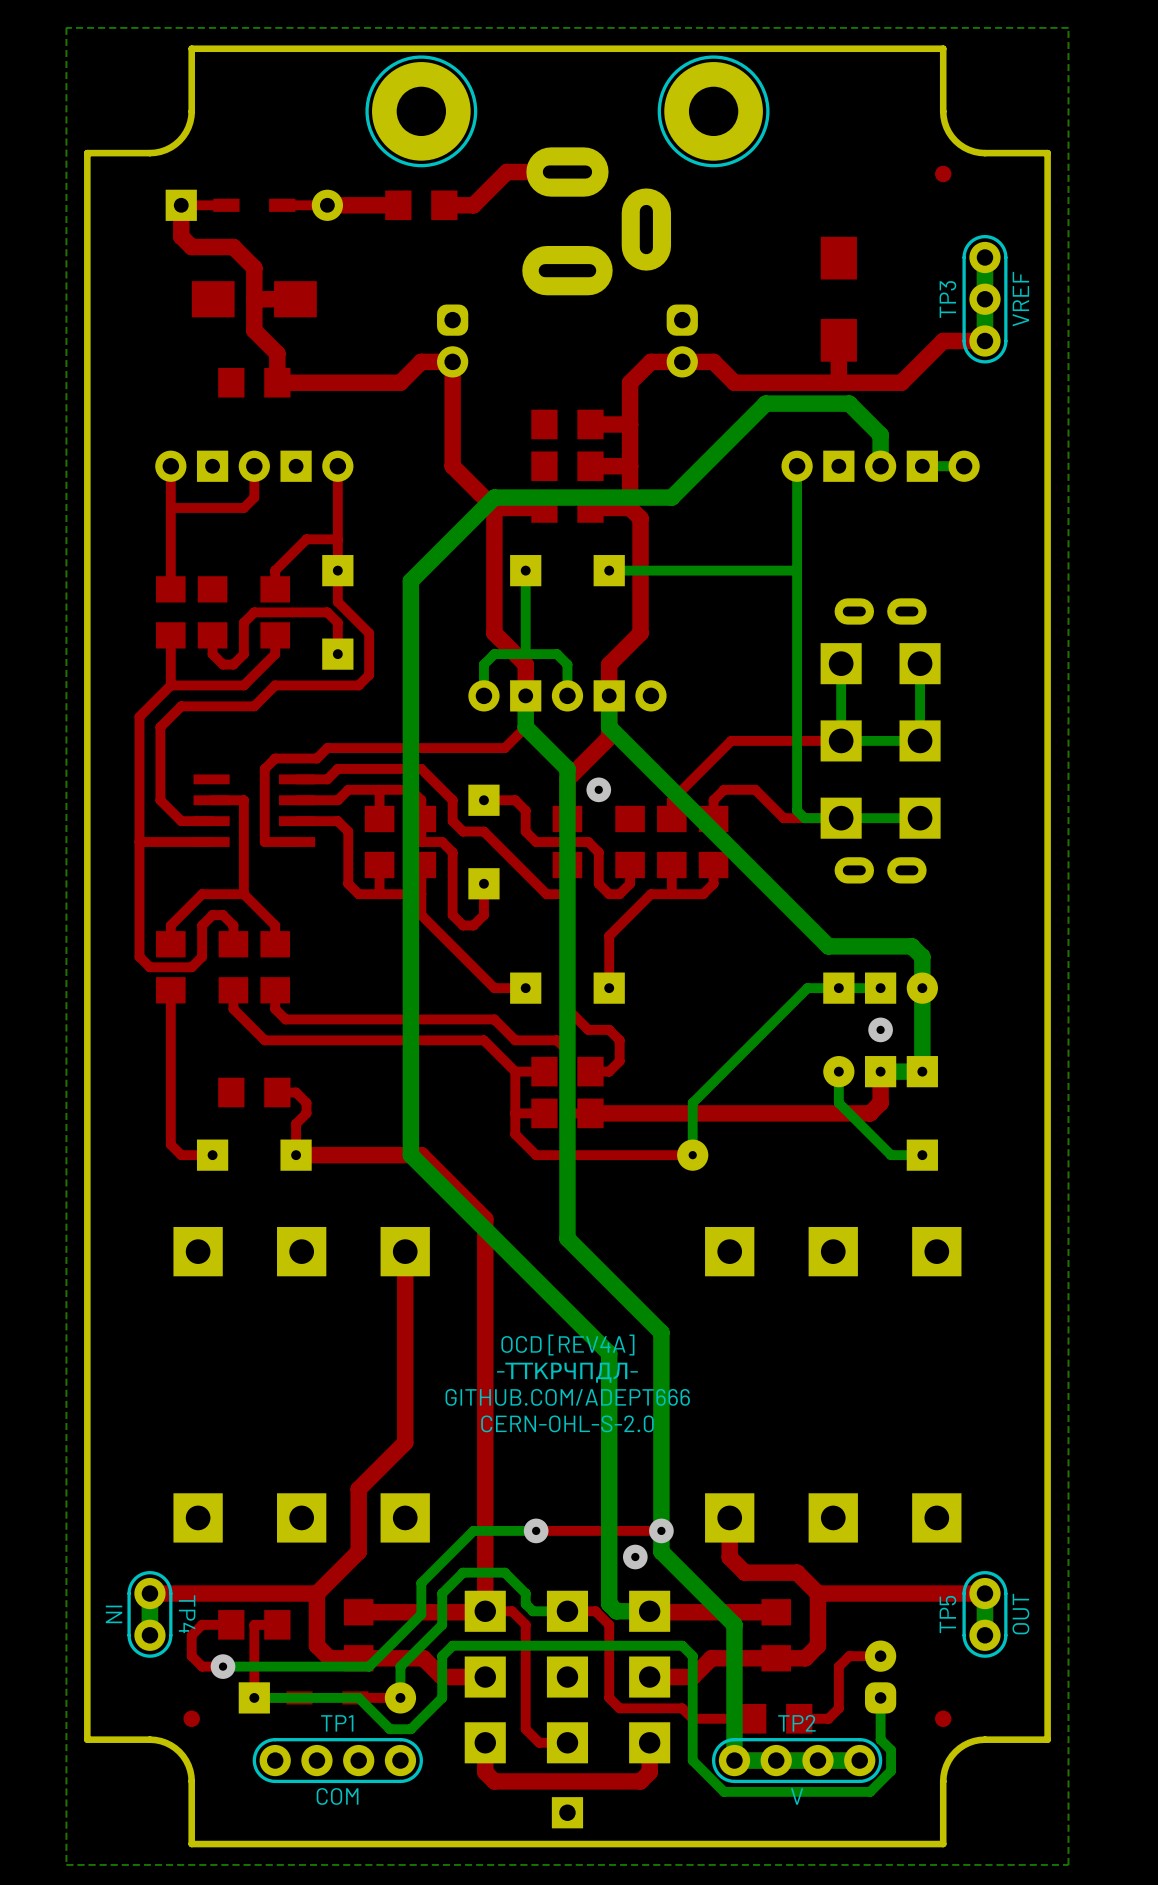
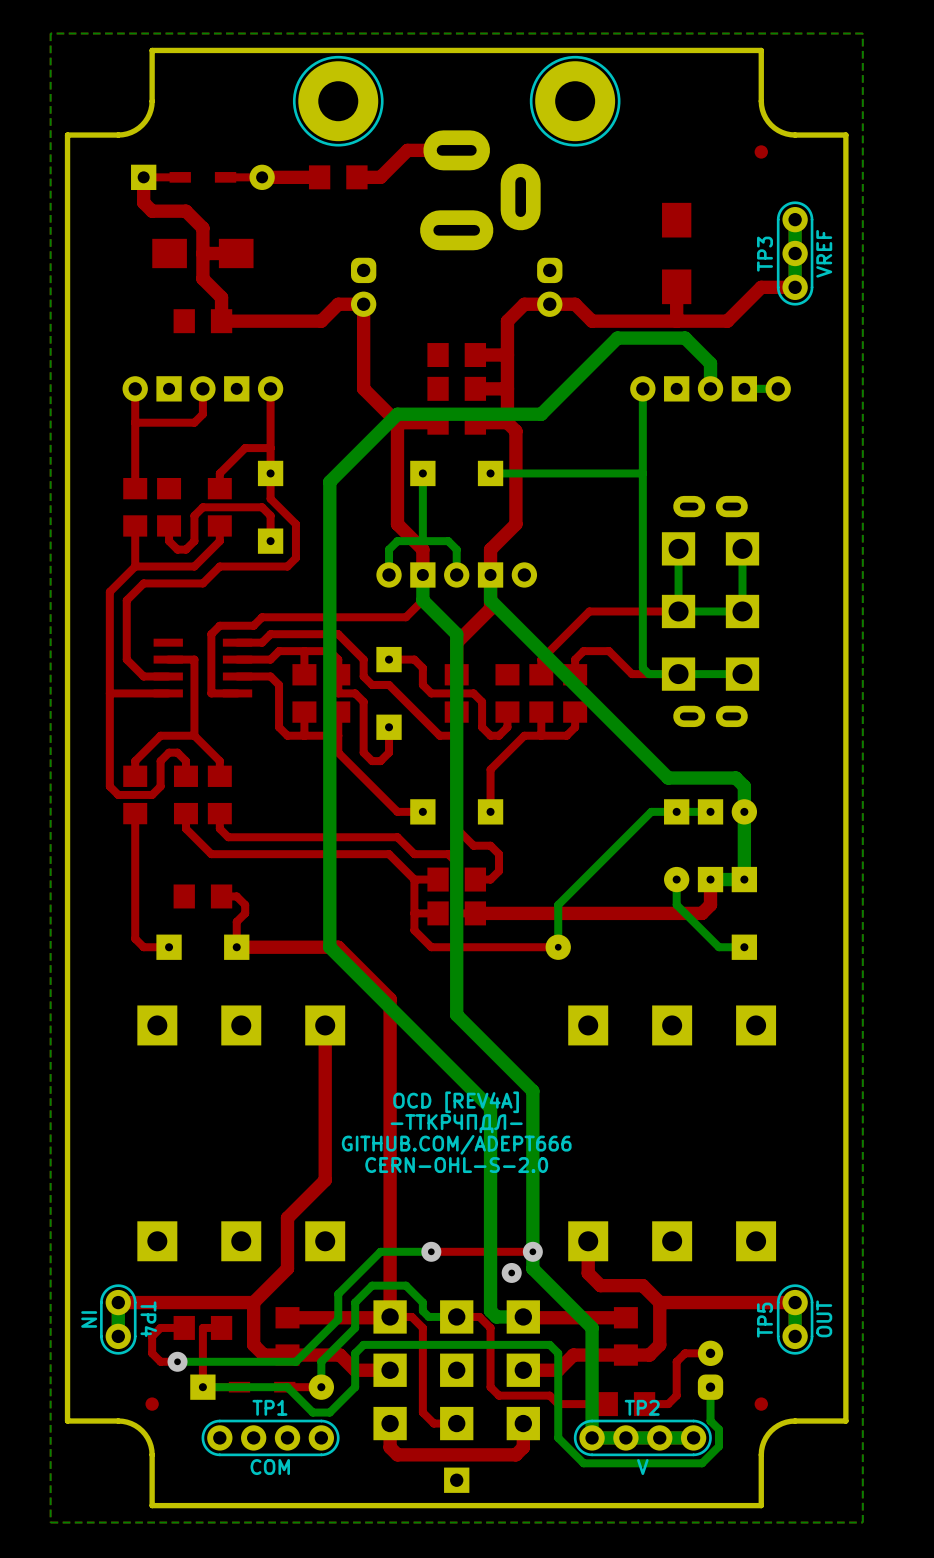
via: (598, 789) -> none
via: (880, 1029) -> none

